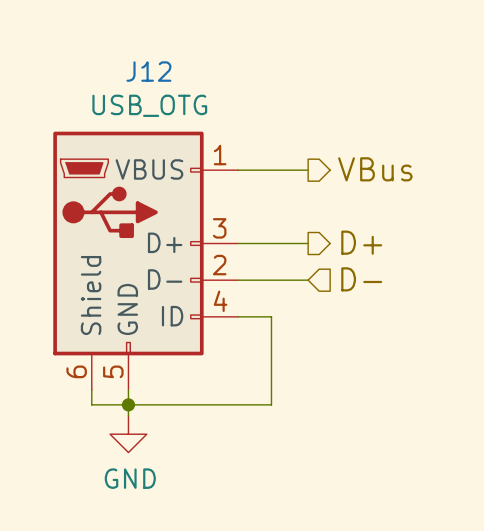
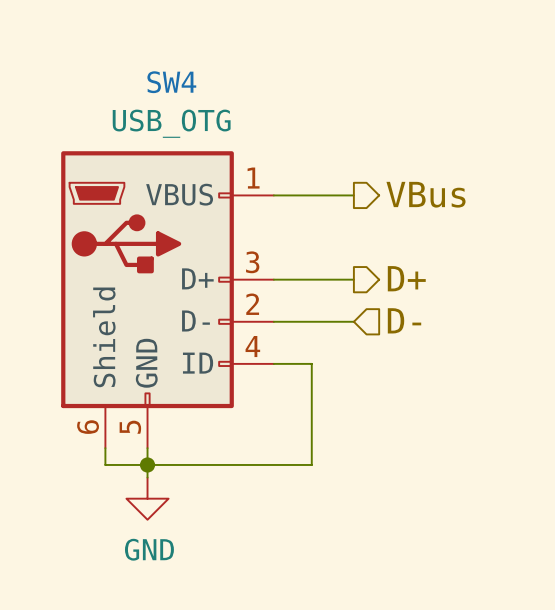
J12 name: J12 (148, 71) -> SW4 (171, 82)

